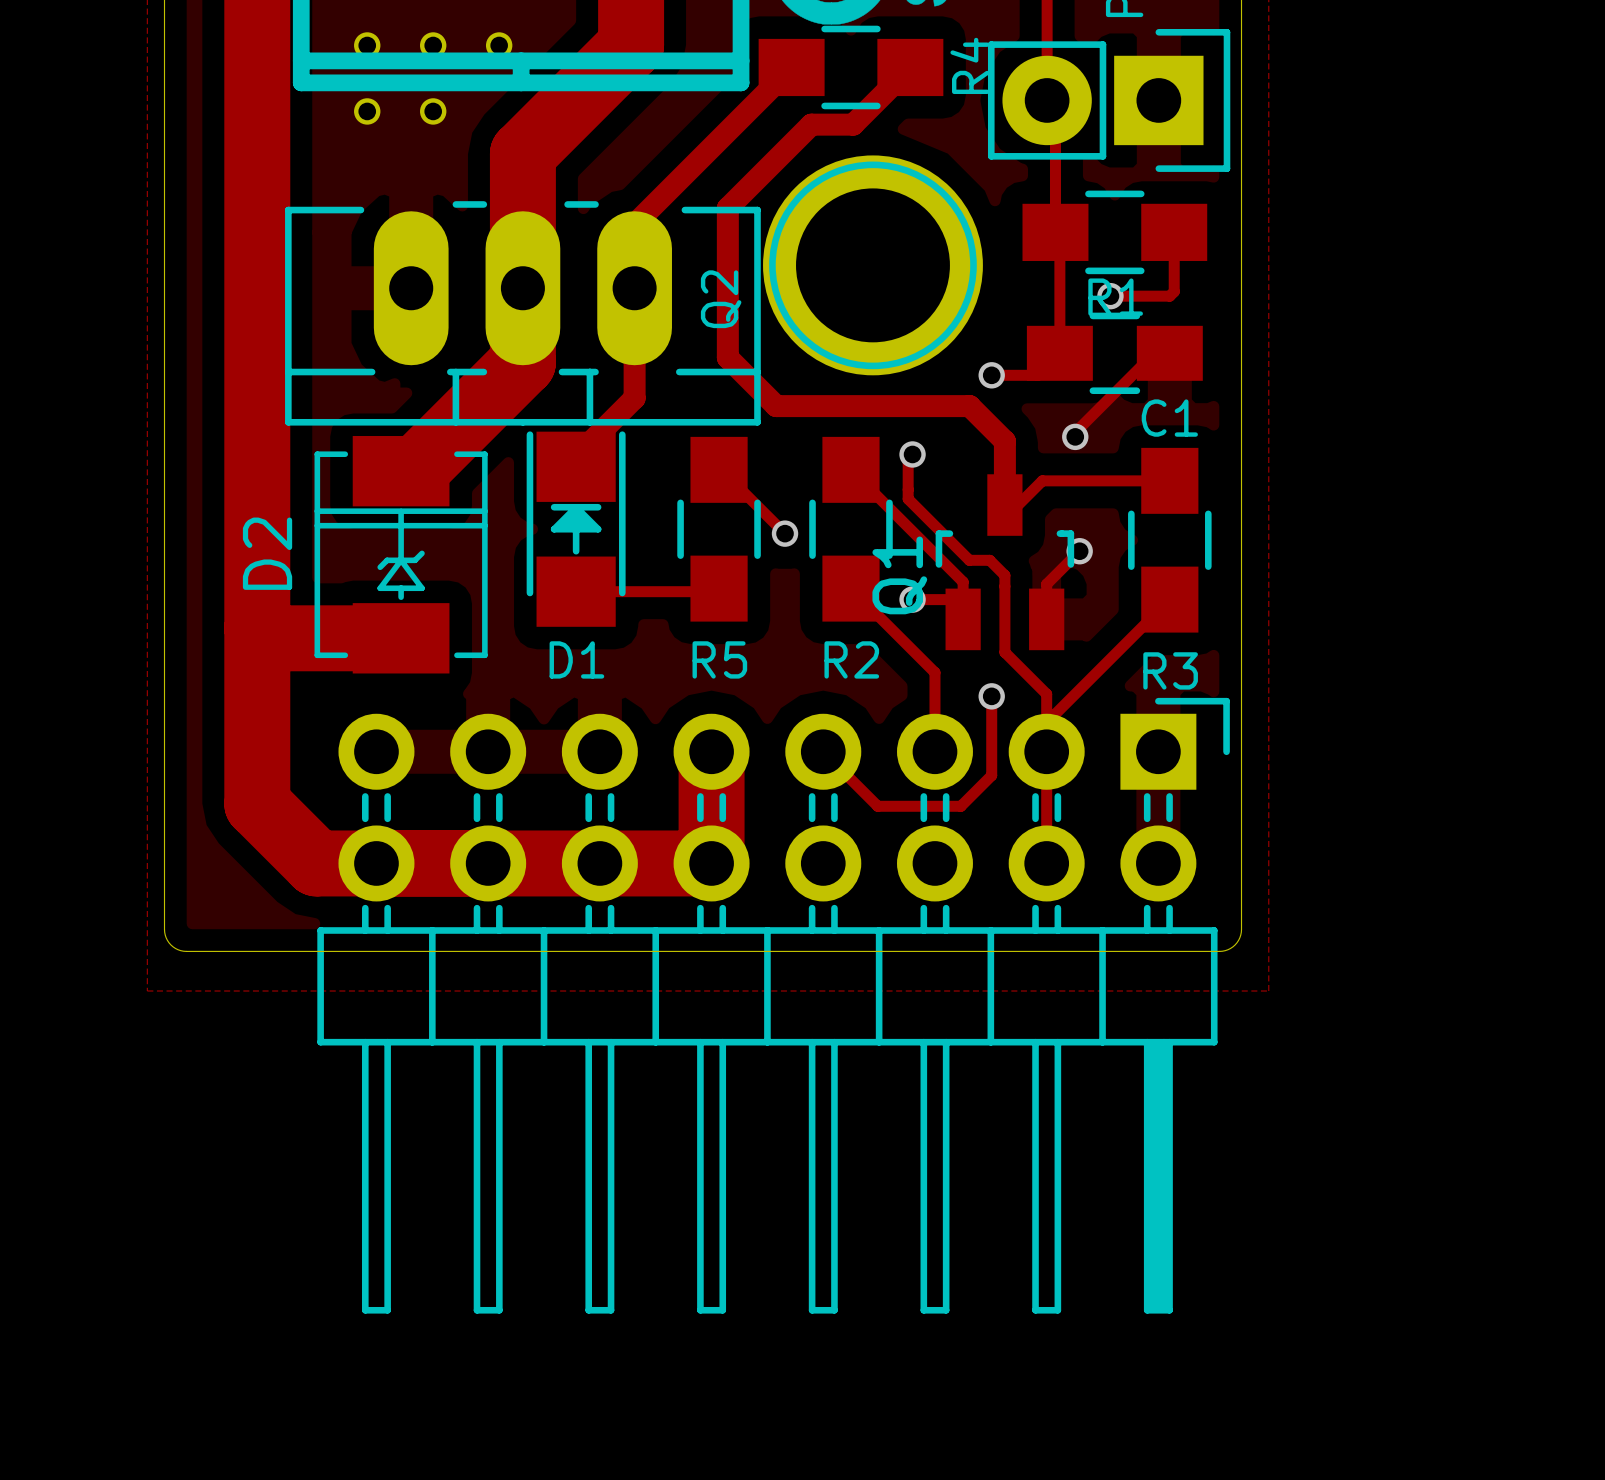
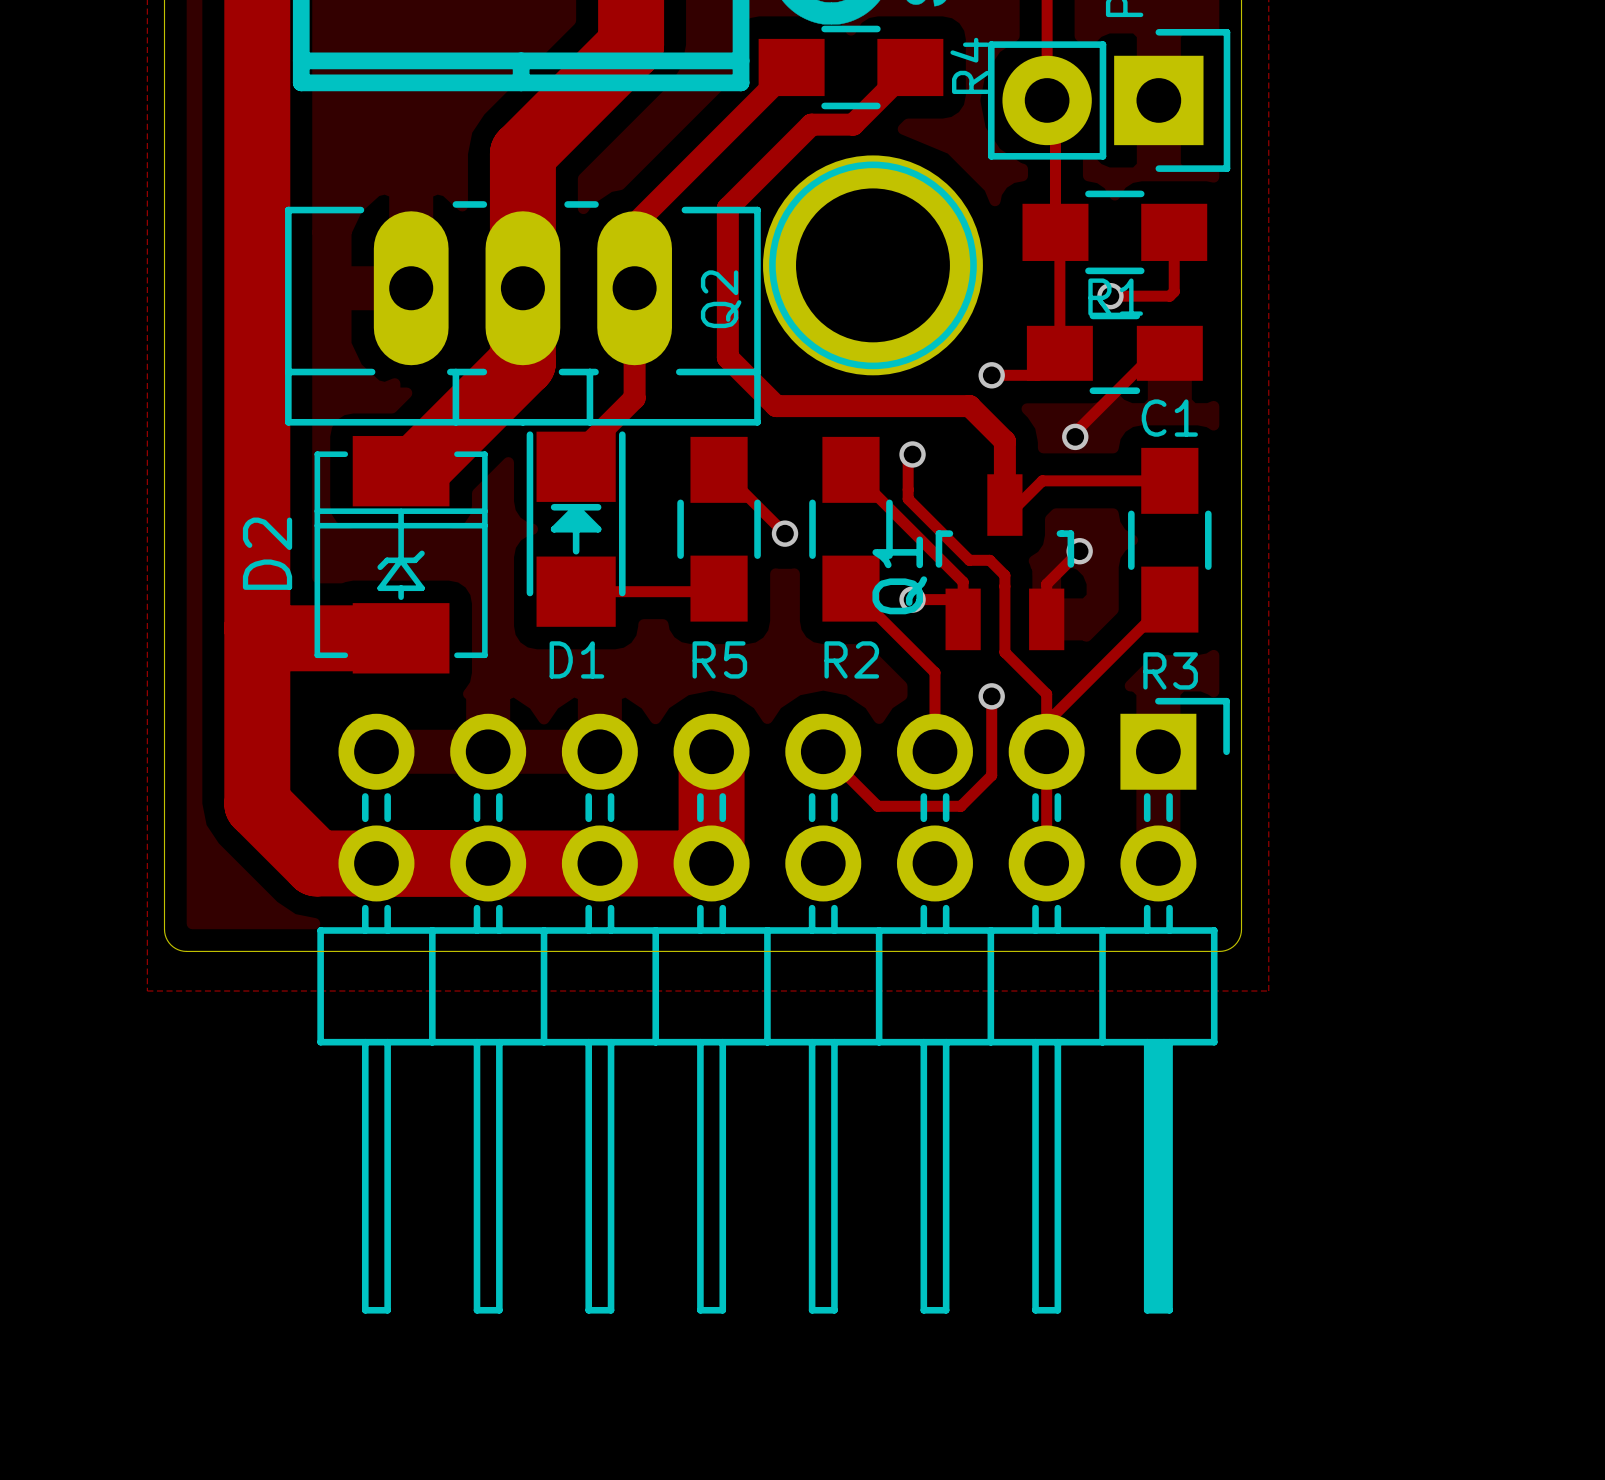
part: (367, 45) -> none
part: (433, 45) -> none
part: (499, 45) -> none
part: (367, 111) -> none
part: (433, 111) -> none

